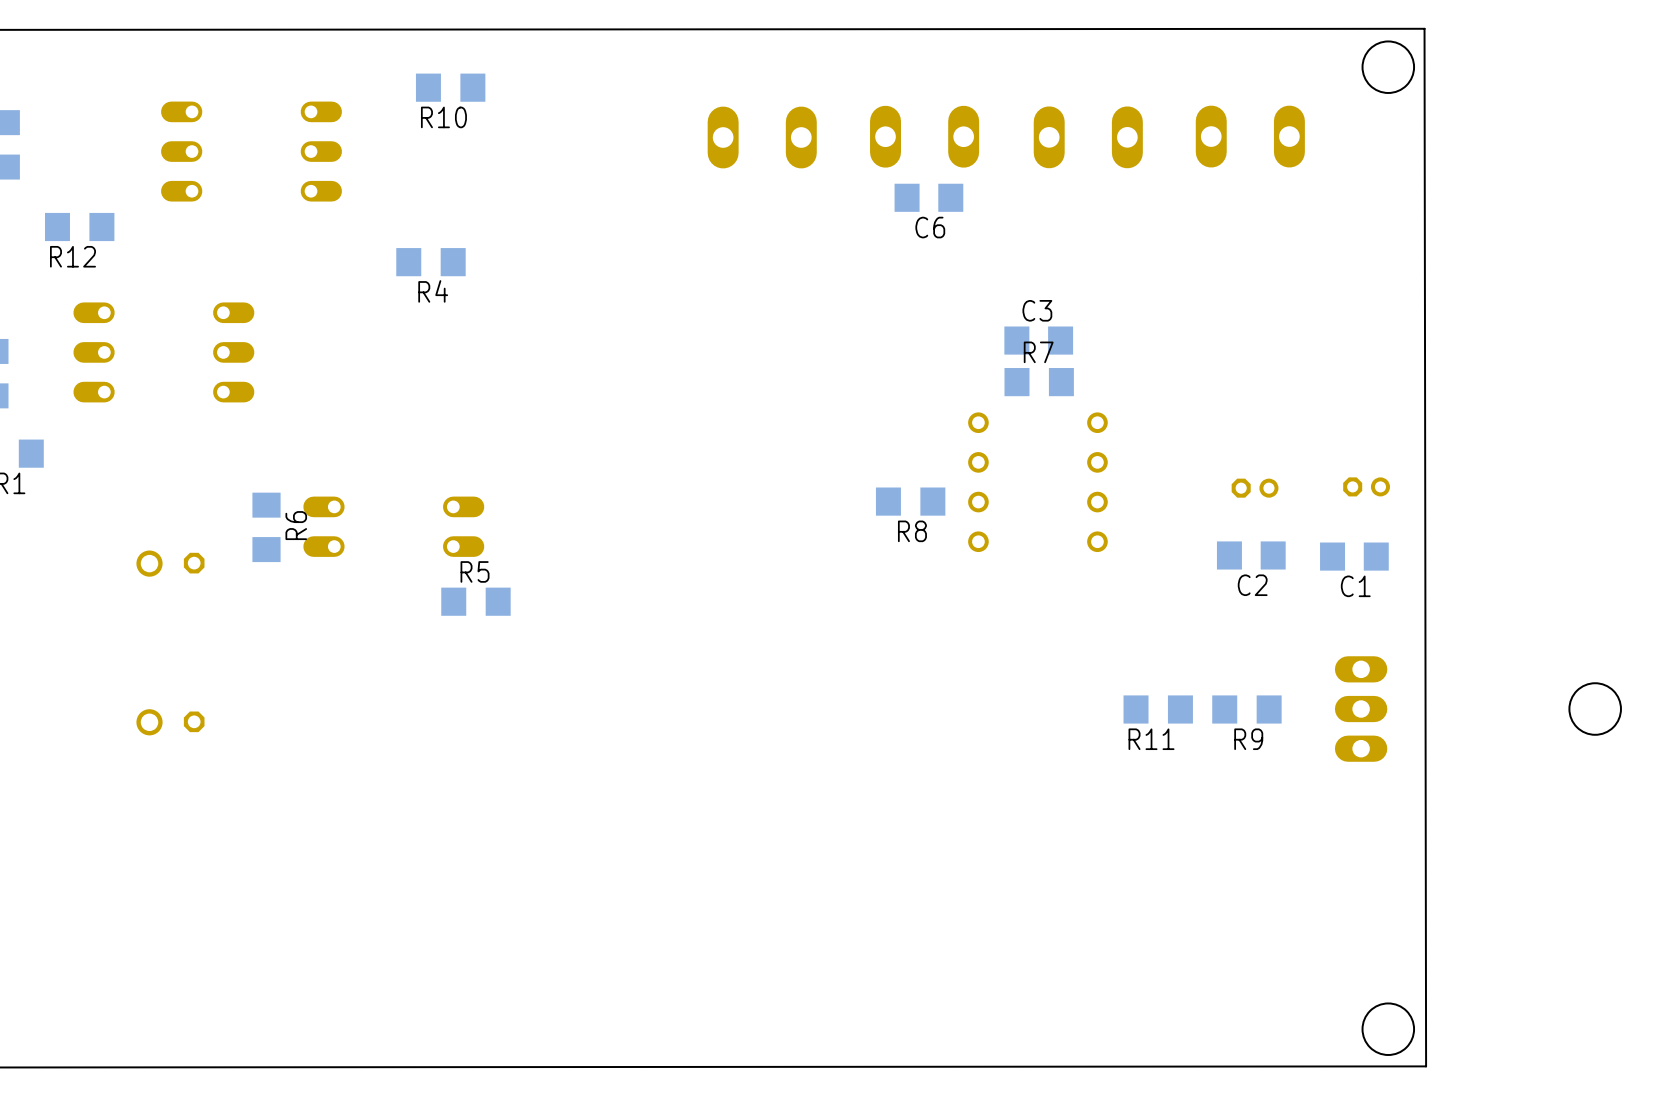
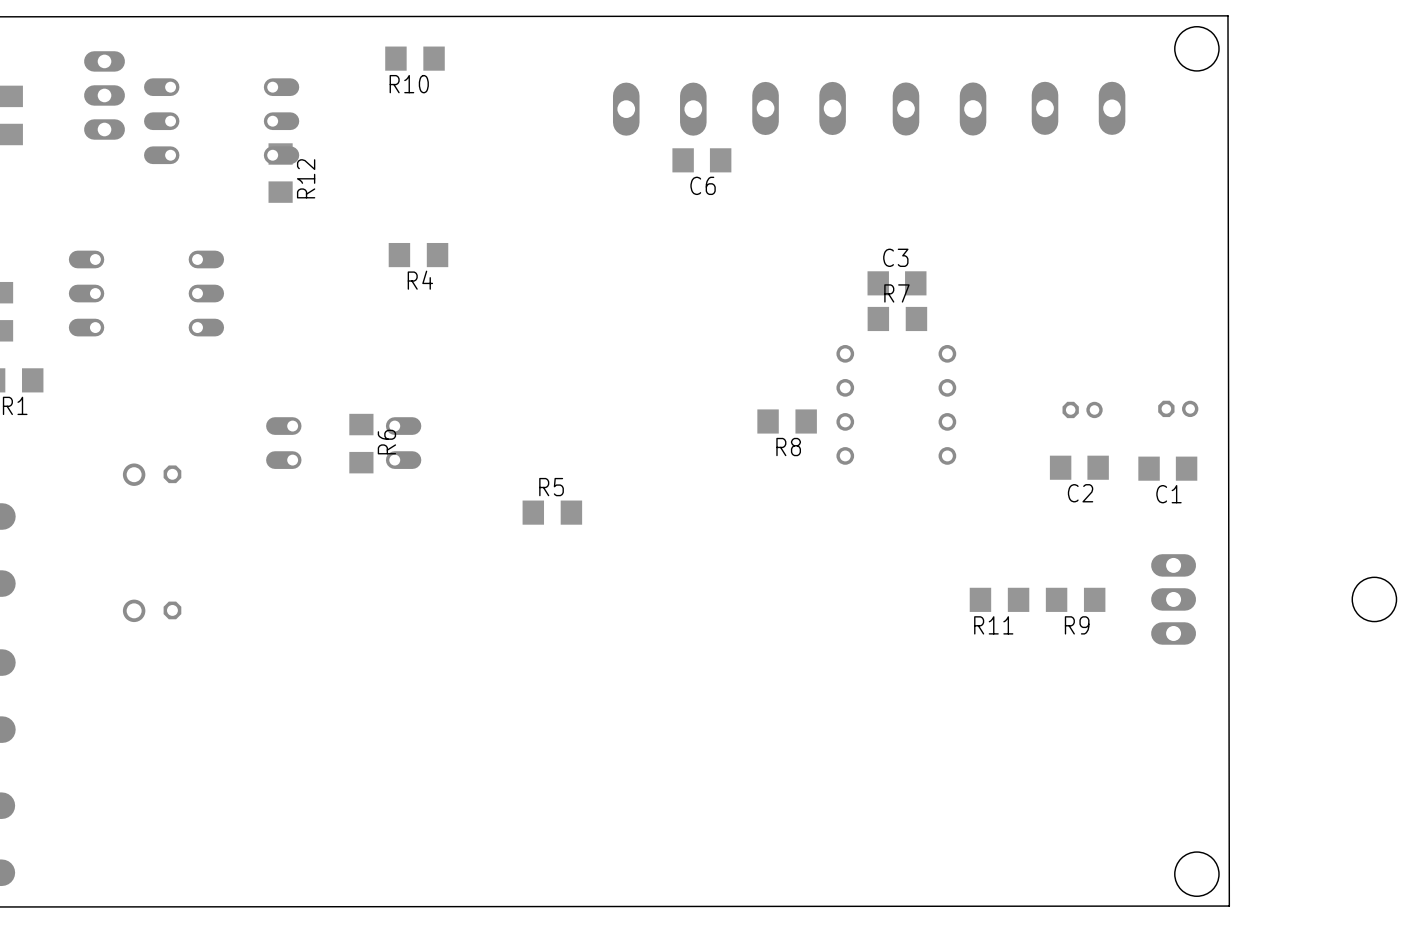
R10 position: (450, 87) -> (414, 58)
part: none -> (104, 95)
C6 position: (928, 197) -> (701, 160)
R12 rotation: 0° (79, 227) -> 90° clockwise (280, 173)
R12 position: (79, 227) -> (280, 173)
R12 name position: R12 (72, 256) -> R12 (306, 178)
R4 position: (430, 262) -> (418, 255)
R6 position: (266, 527) -> (361, 443)
R5 position: (475, 601) -> (552, 512)

